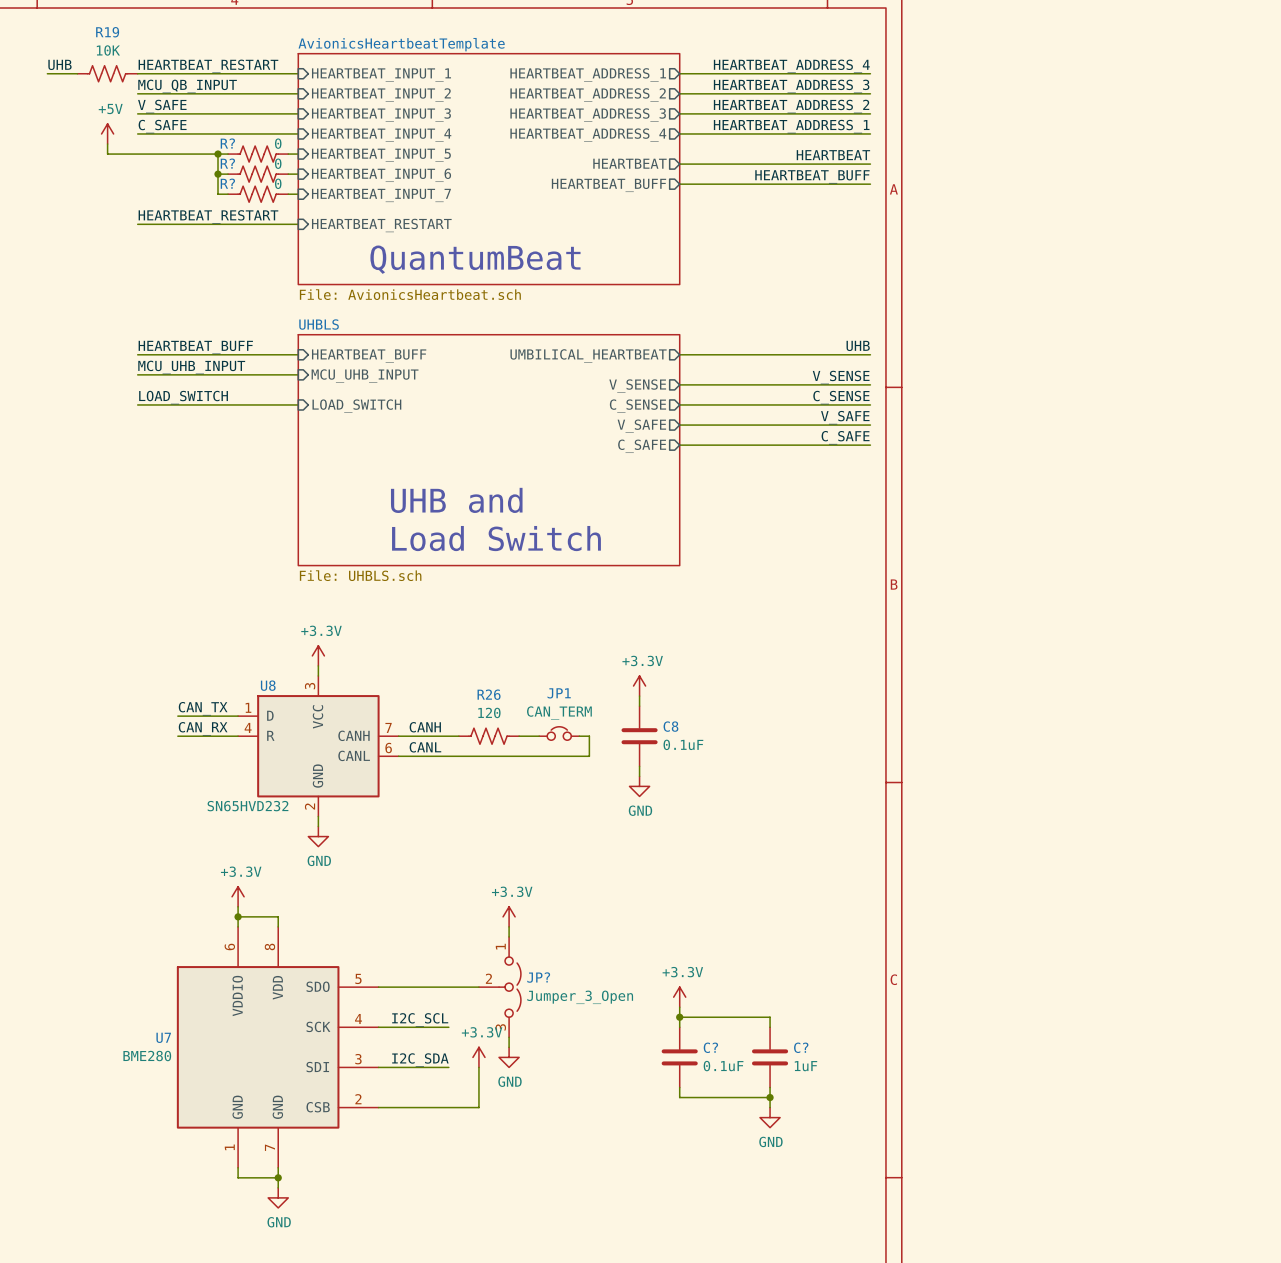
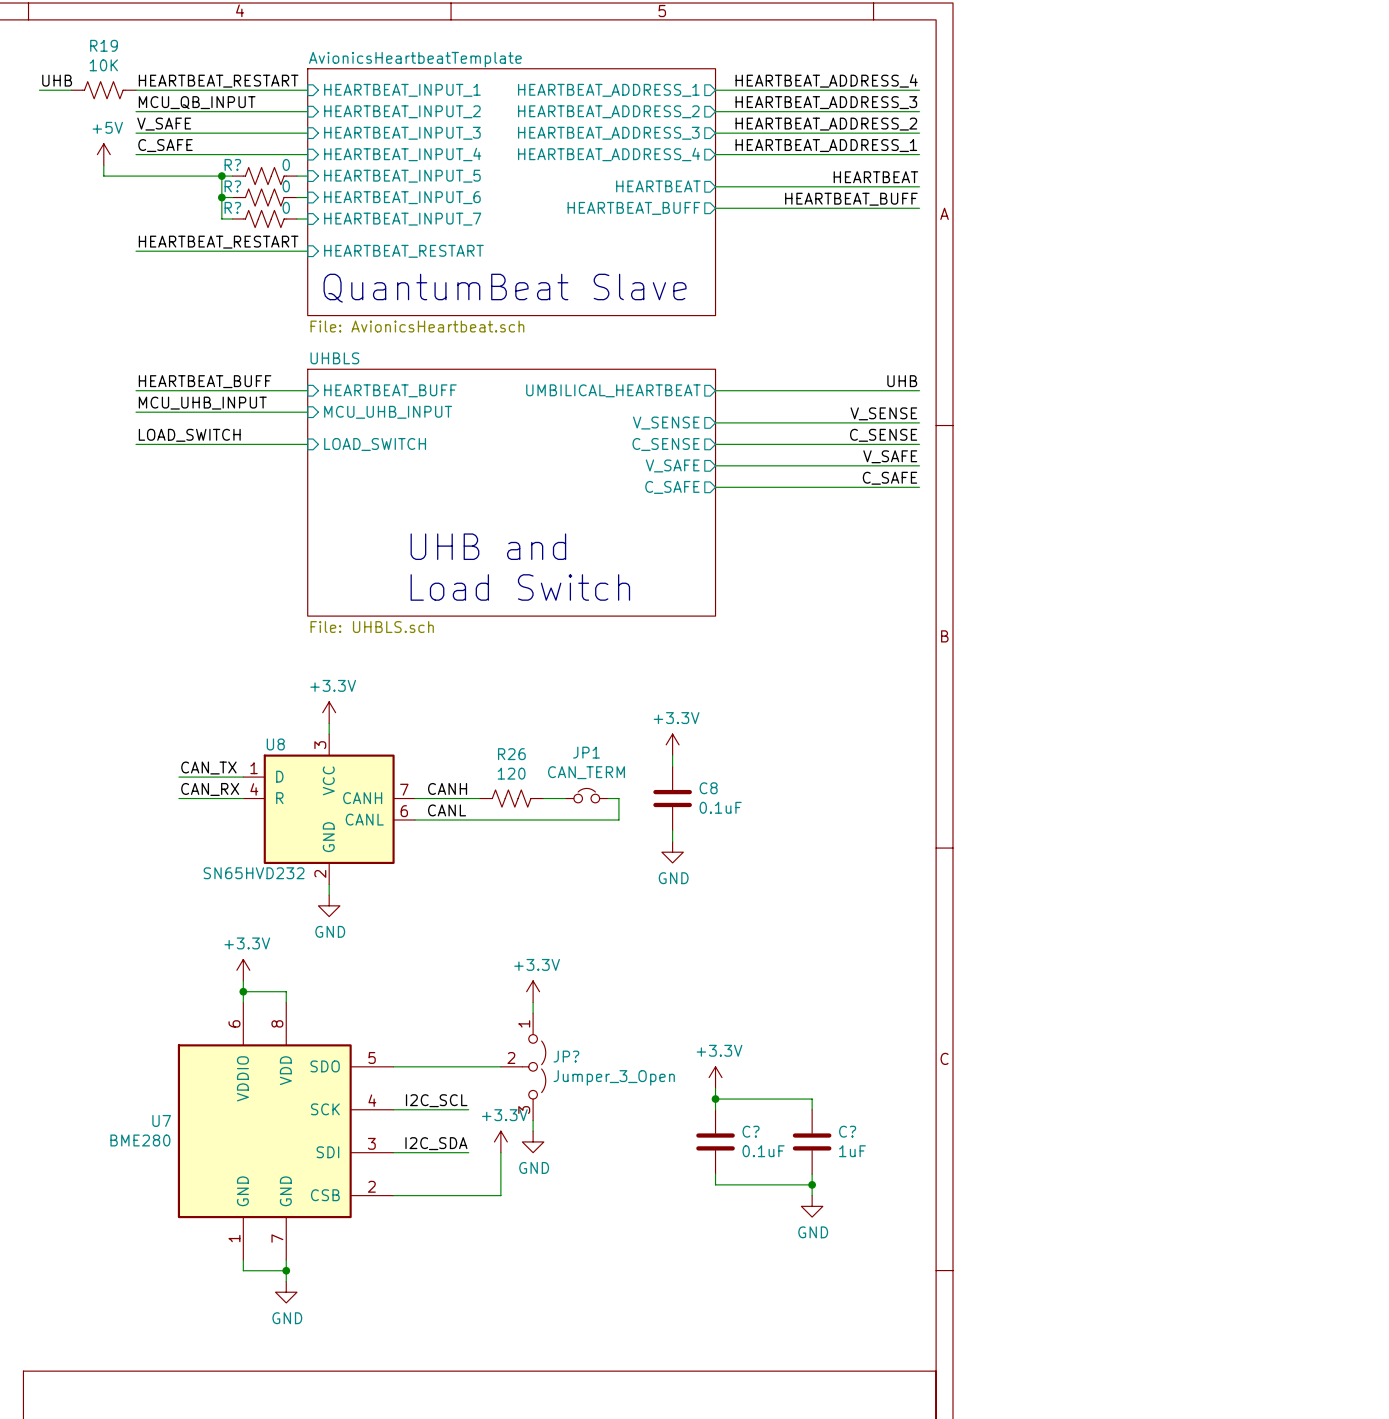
text: QuantumBeat (475, 259) -> QuantumBeat Slave (505, 288)

